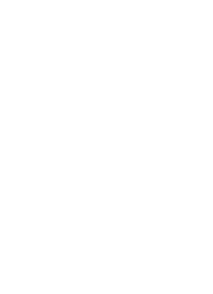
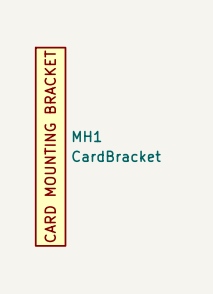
MH1: none -> CardBracket (50, 146)

